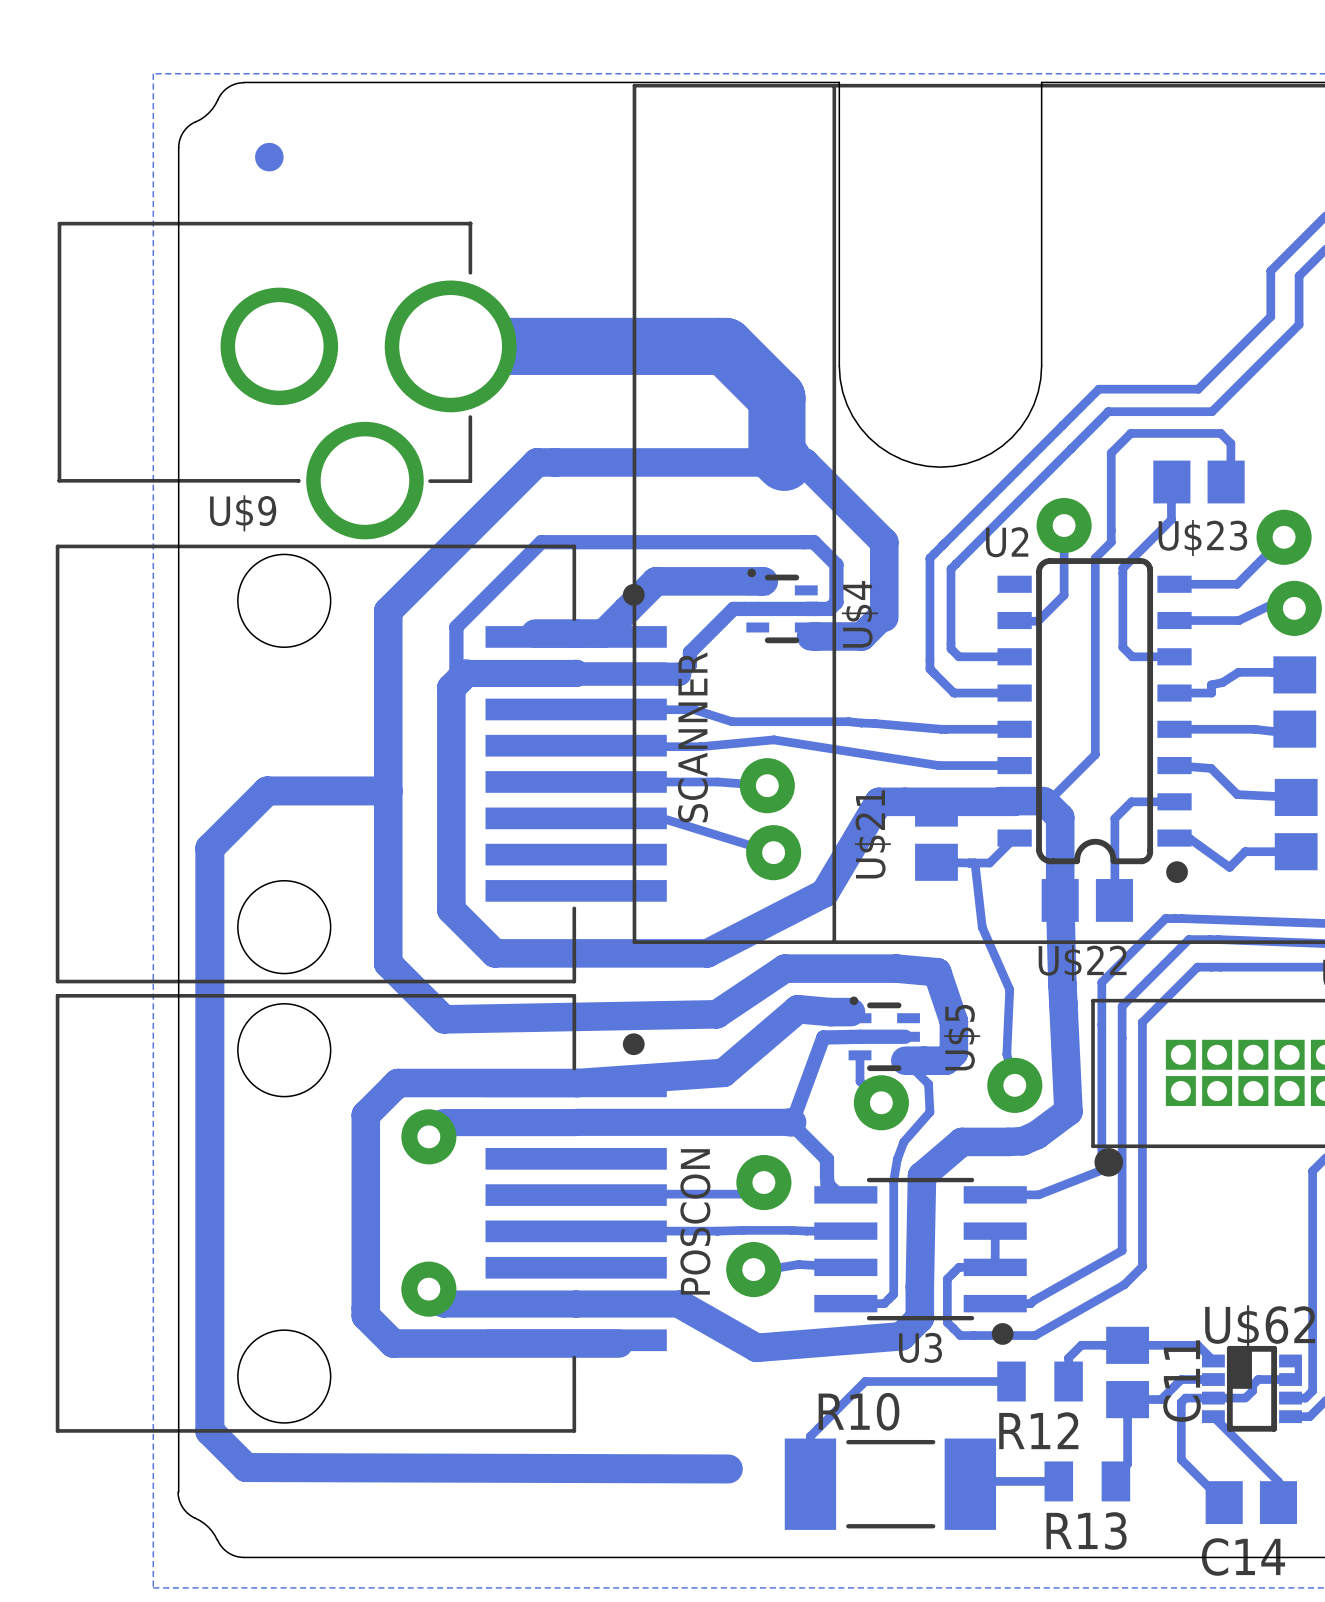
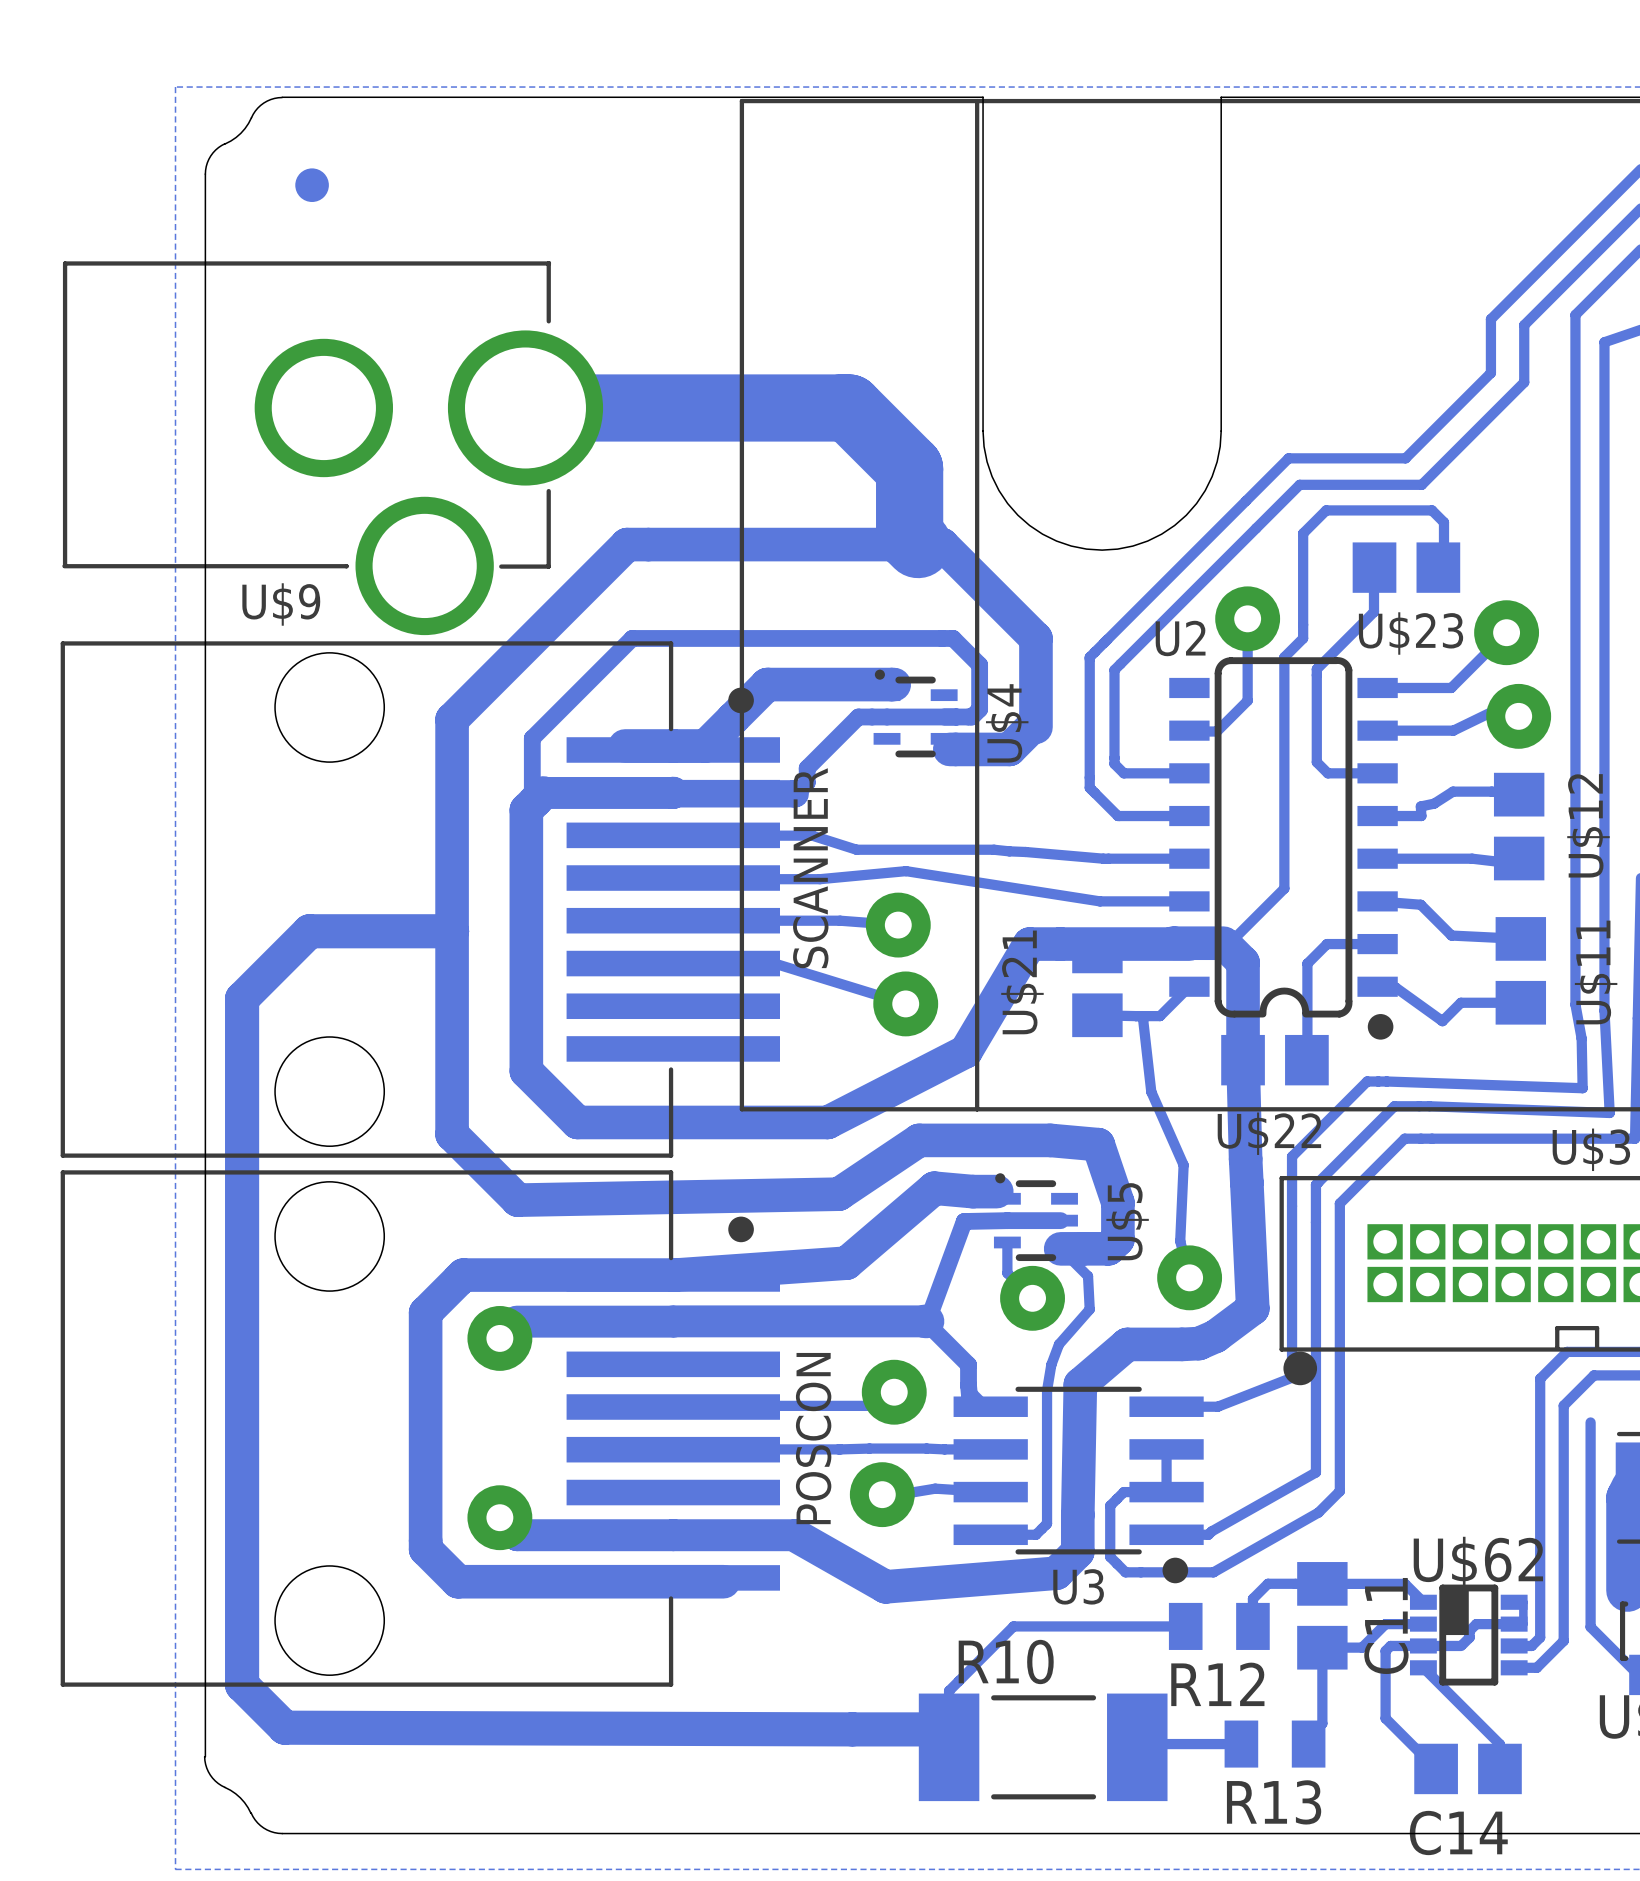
track: none -> (852, 1729) (931, 1729) (949, 1747)

